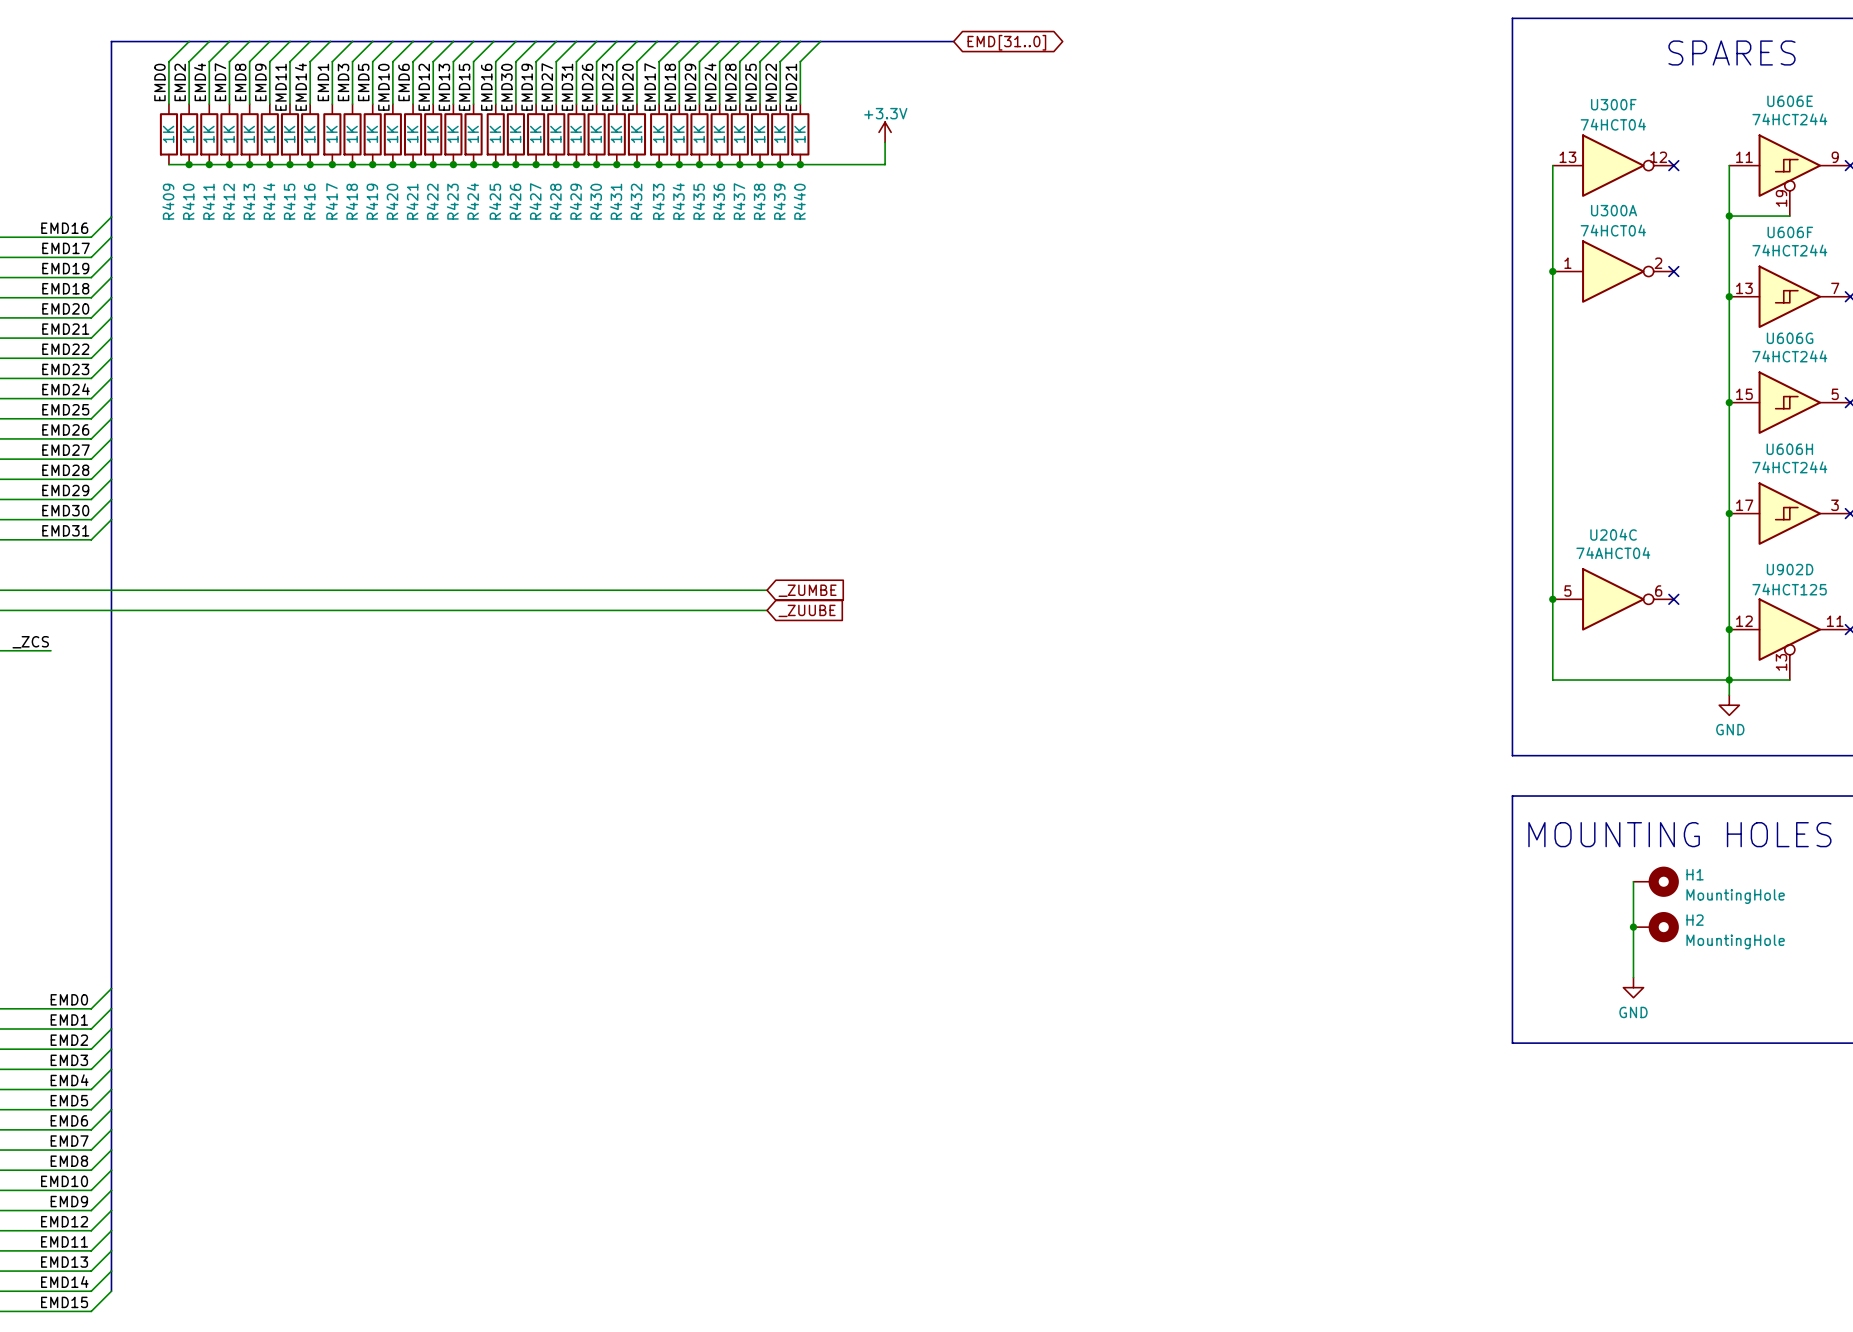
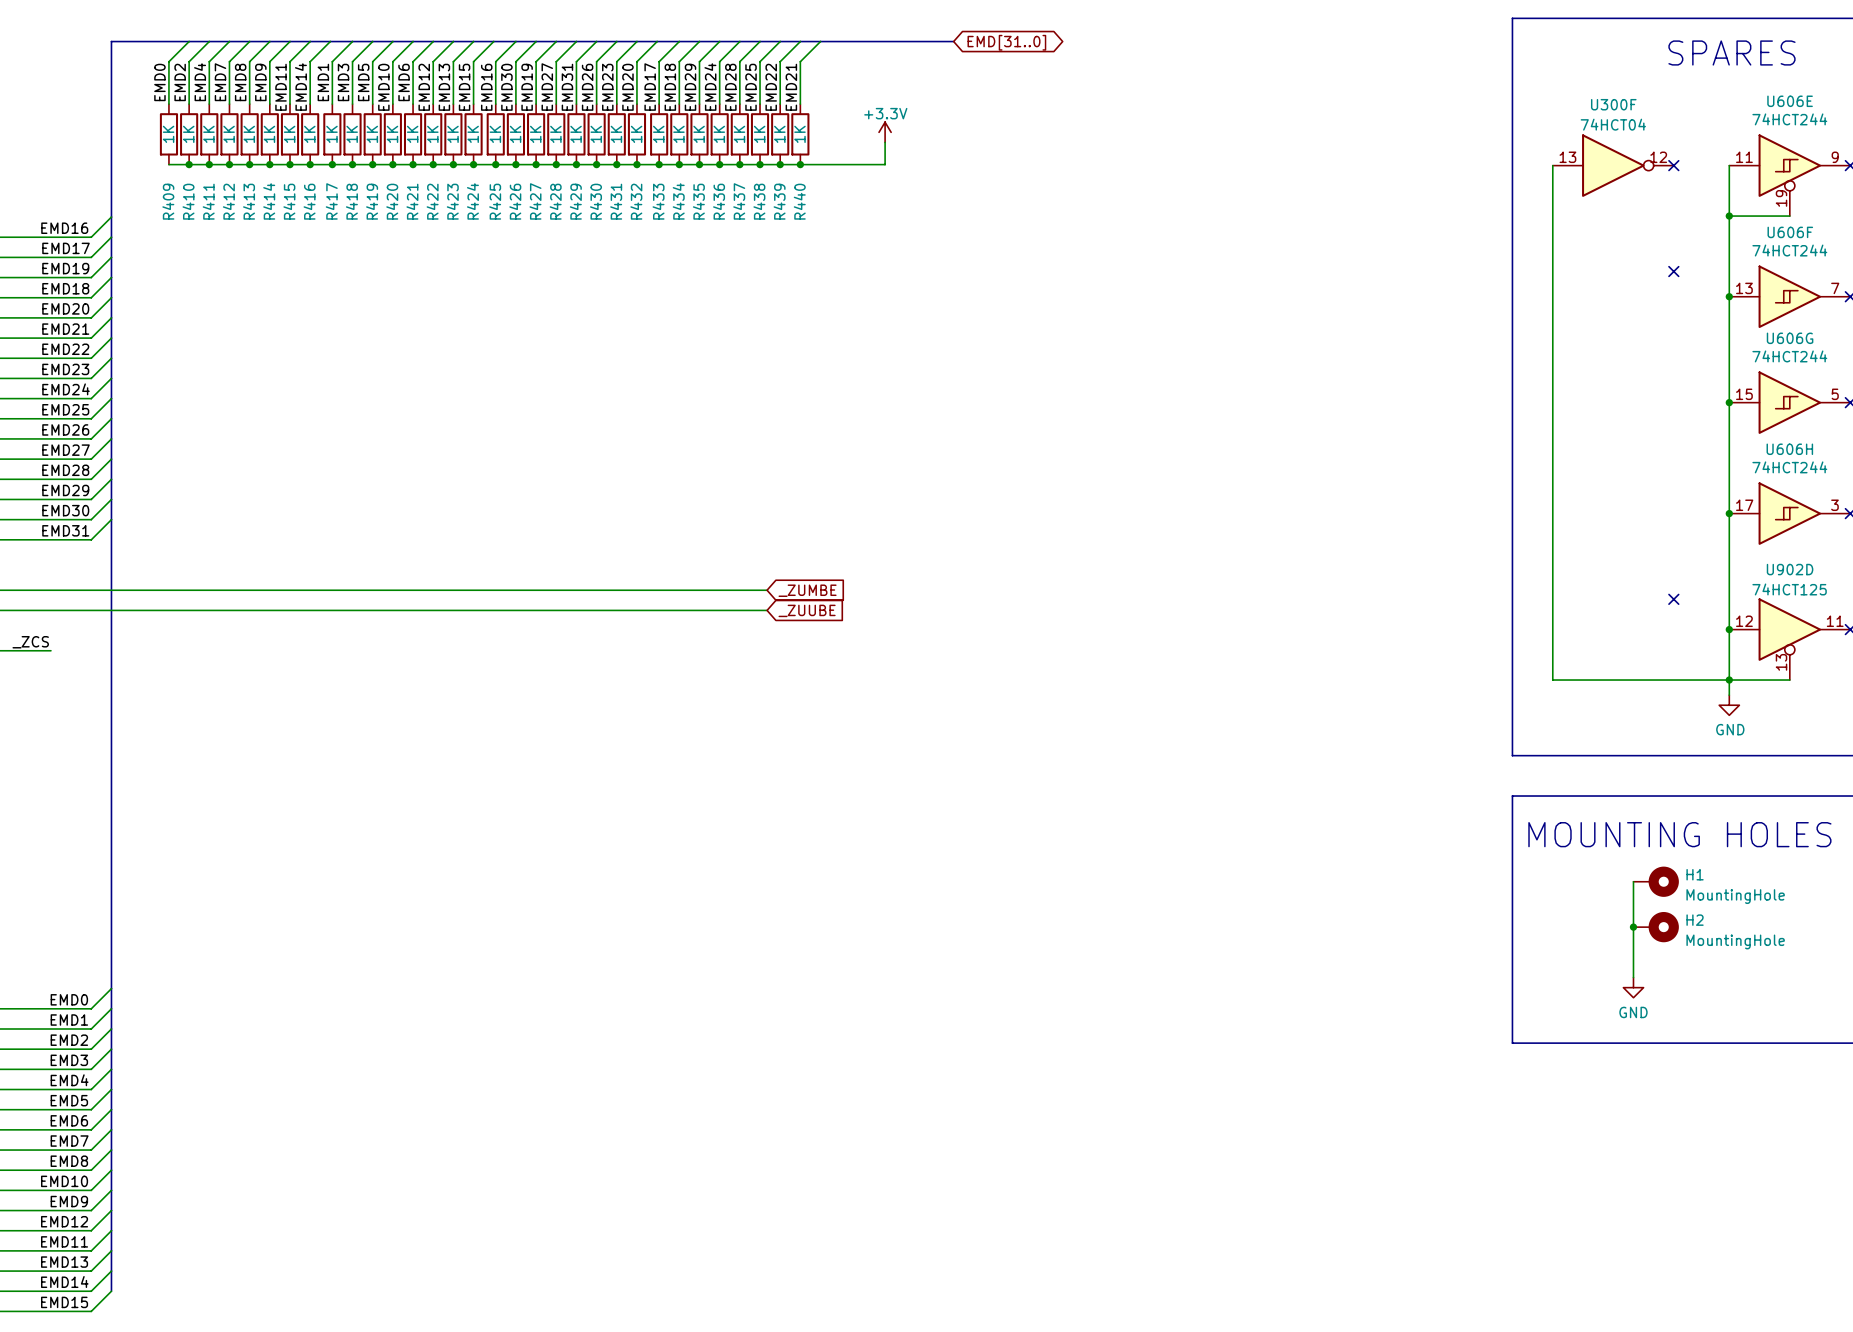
junction: (1552, 271) -> none
U300A: 74HCT04 (1613, 271) -> none
junction: (1552, 599) -> none
U204C: 74AHCT04 (1613, 599) -> none

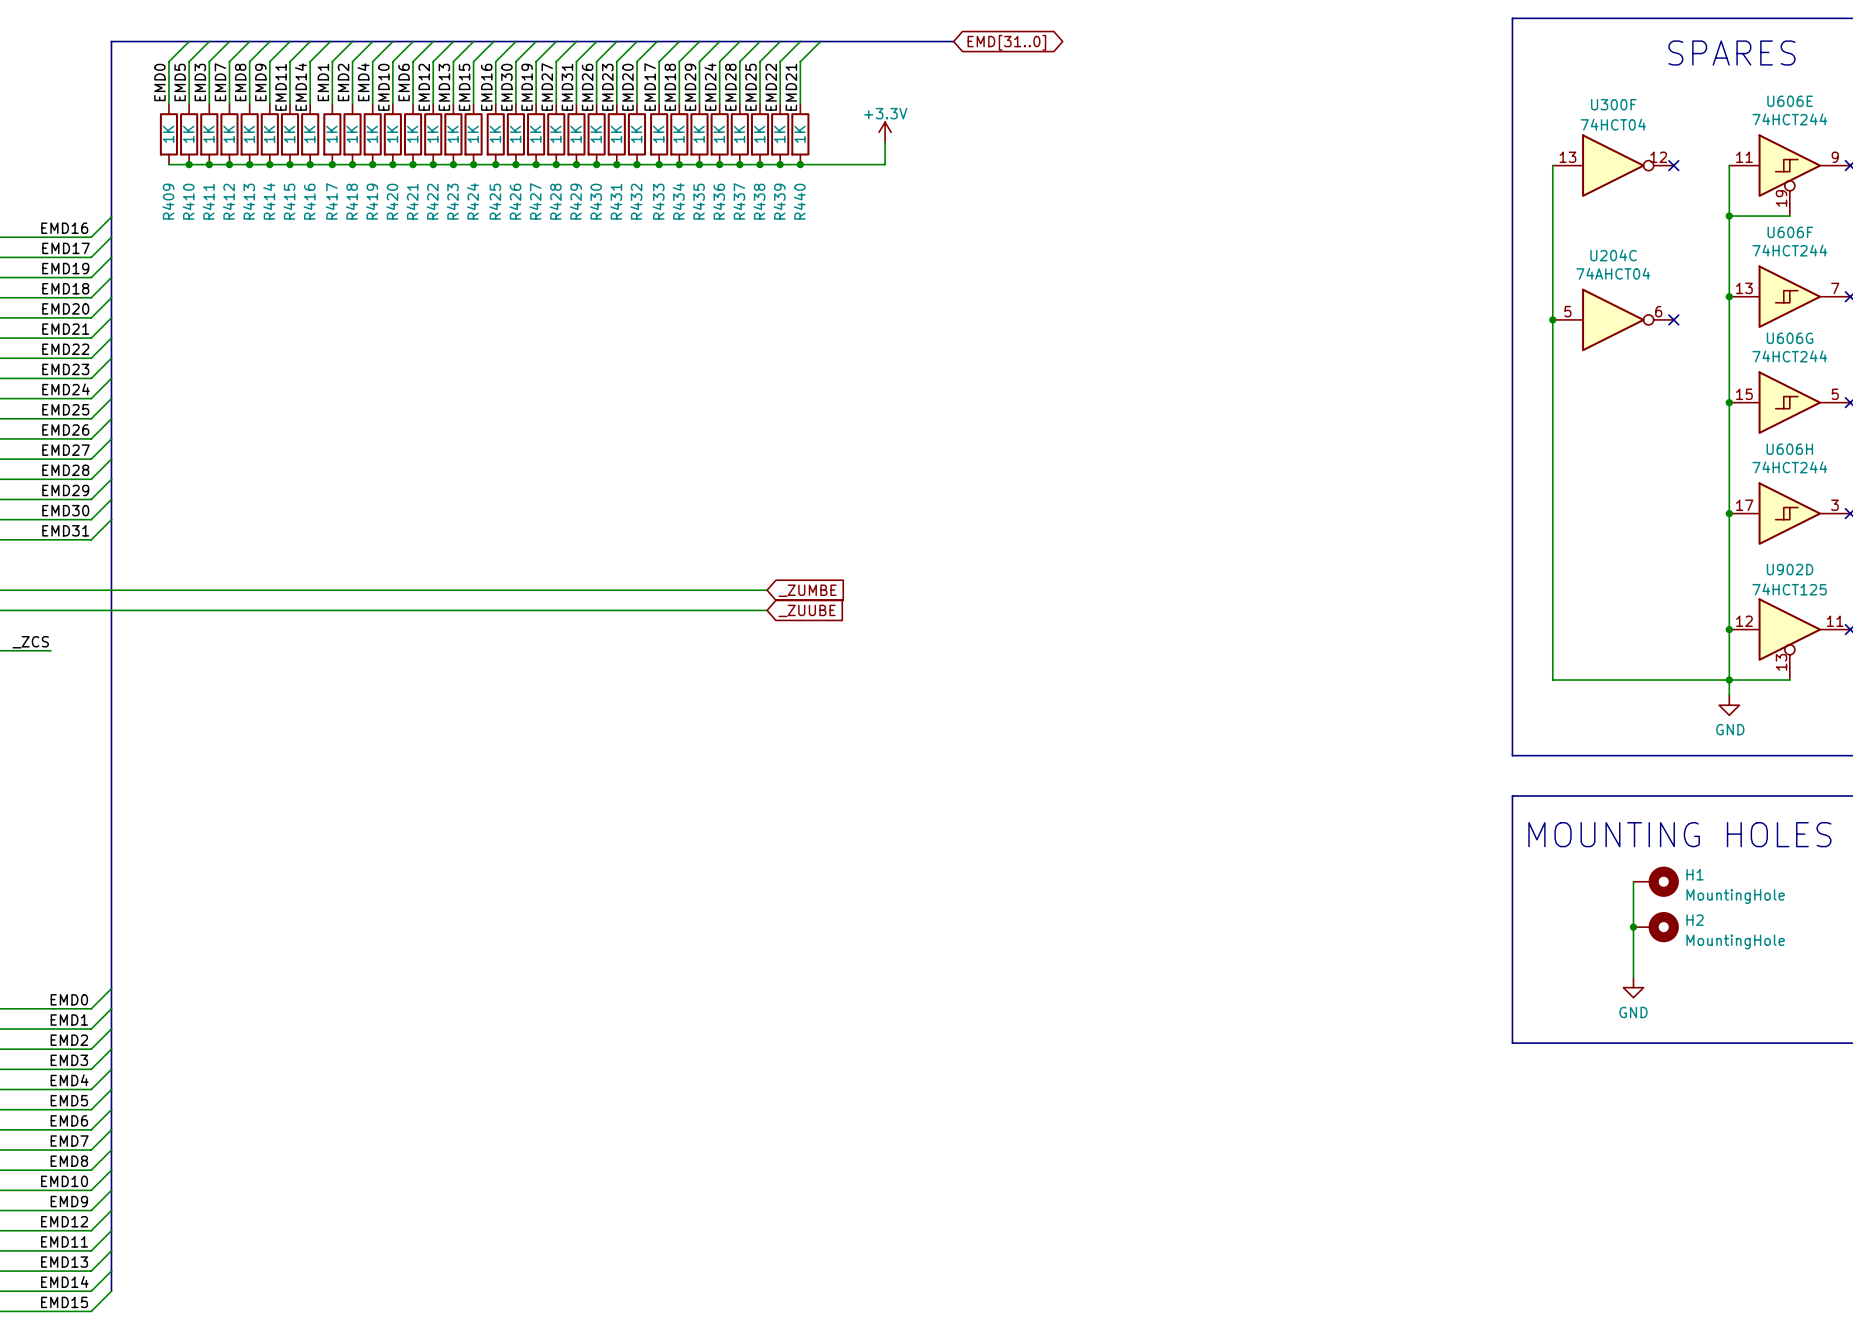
label: EMD2 (180, 82) -> EMD5 (180, 82)
label: EMD4 (200, 82) -> EMD3 (200, 82)
label: EMD3 (343, 82) -> EMD2 (343, 82)
label: EMD5 (363, 82) -> EMD4 (363, 82)
no-connect mark: (1673, 271) -> none
junction: none -> (1552, 319)
U204C: none -> 74AHCT04 (1613, 319)
no-connect mark: none -> (1673, 319)
no-connect mark: (1673, 599) -> none

